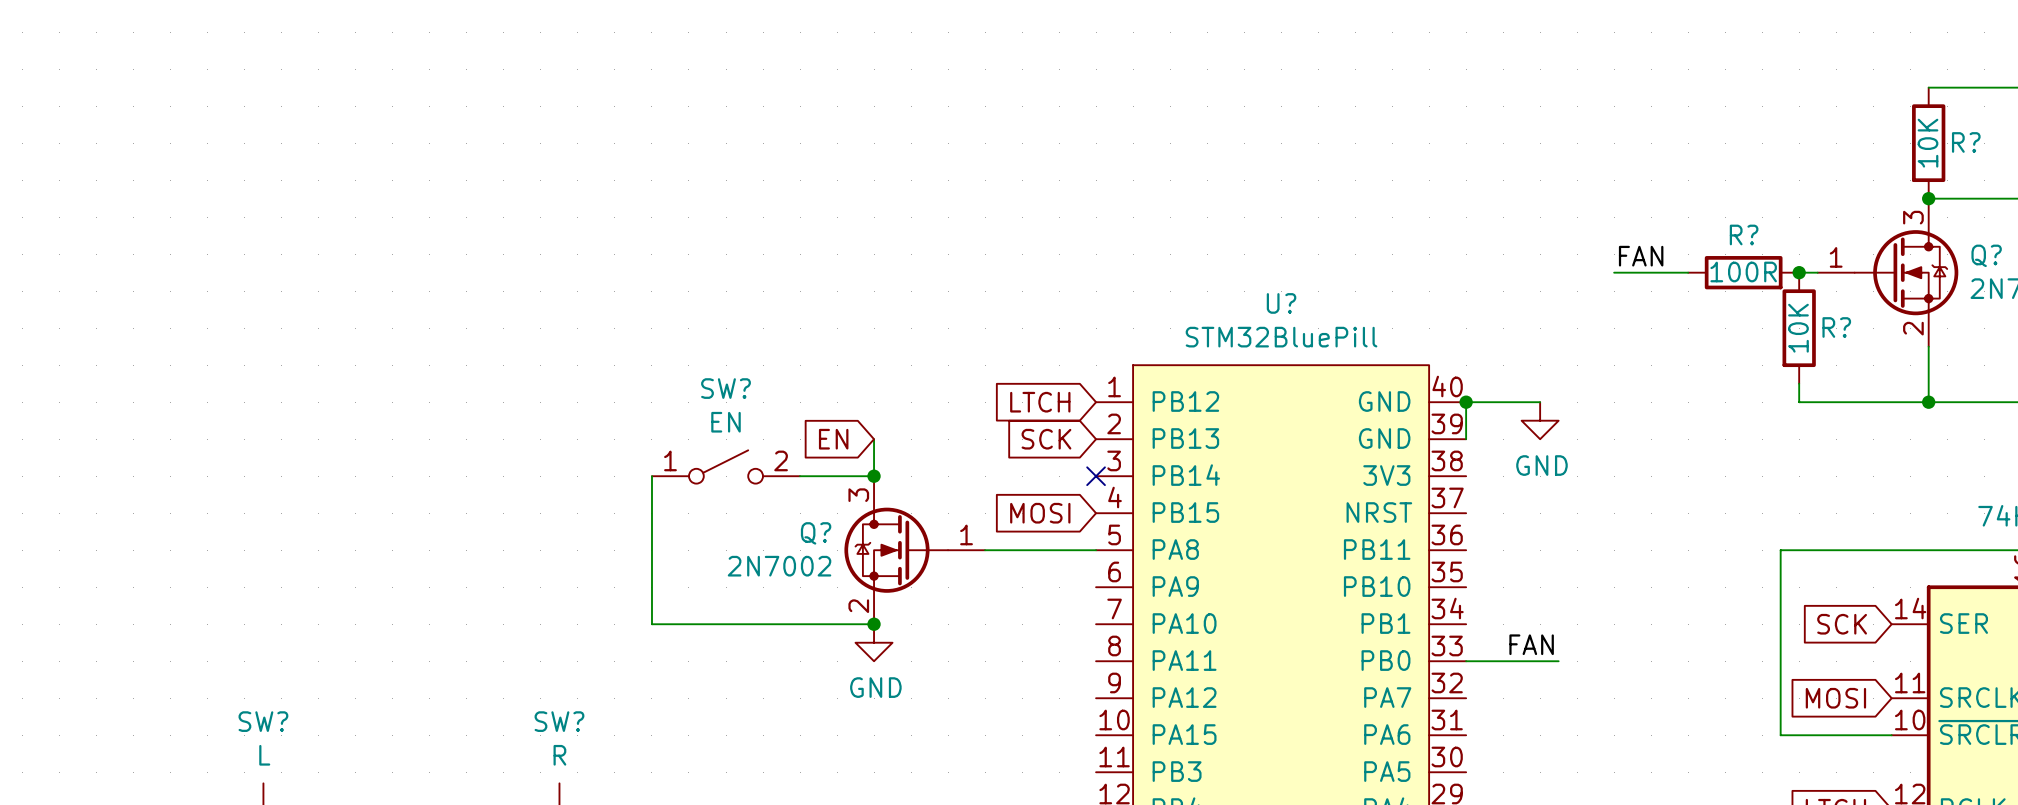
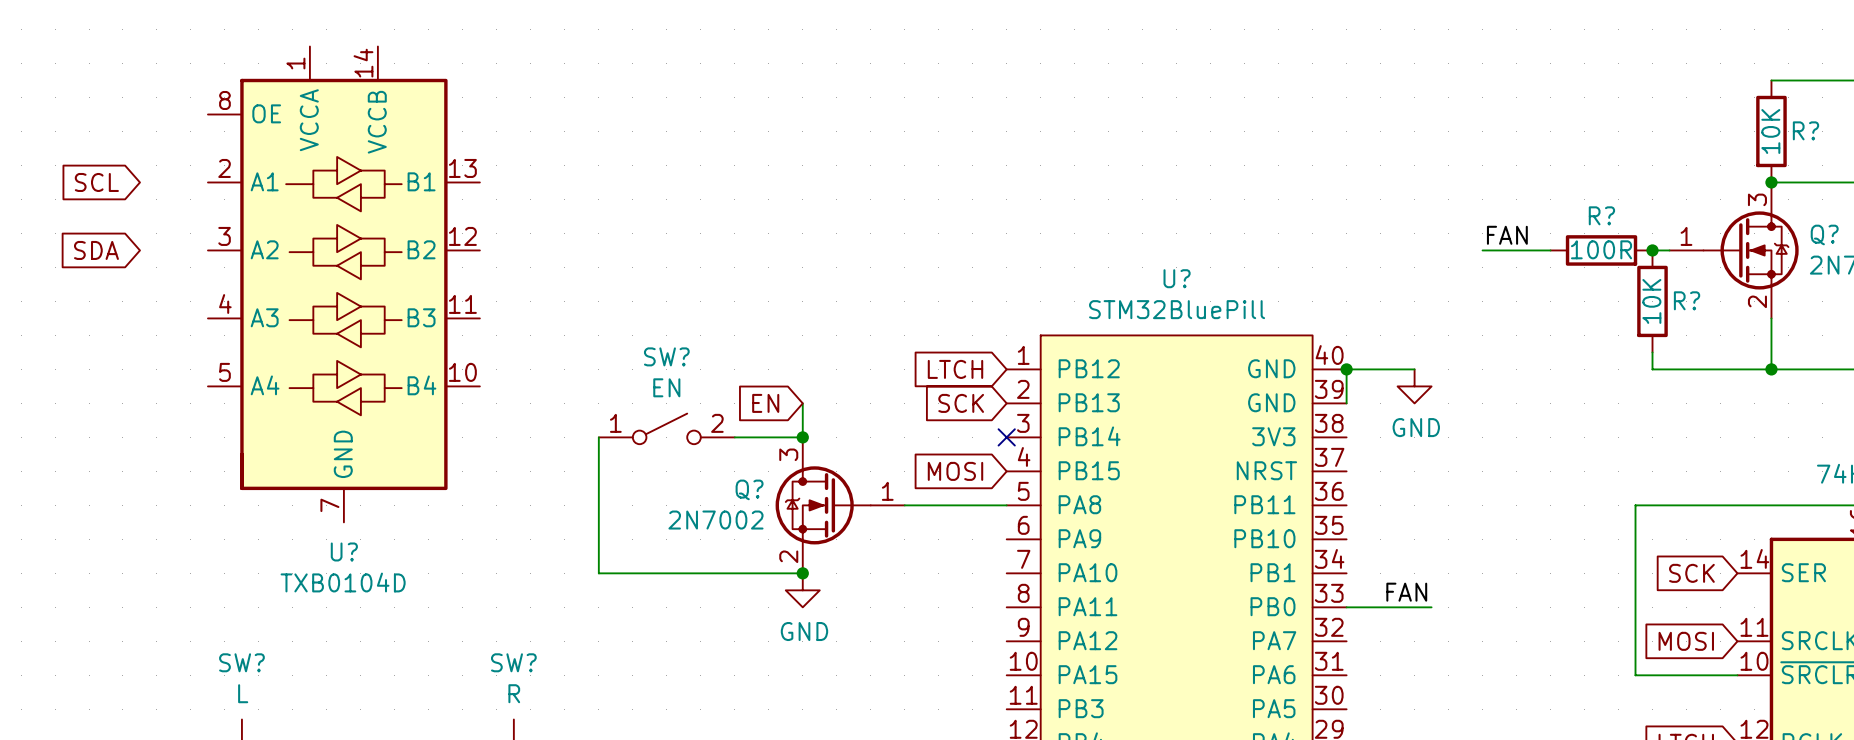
global label: none -> SCL (96, 182)
global label: none -> SDA (96, 250)
U?: none -> TXB0104D (343, 284)

